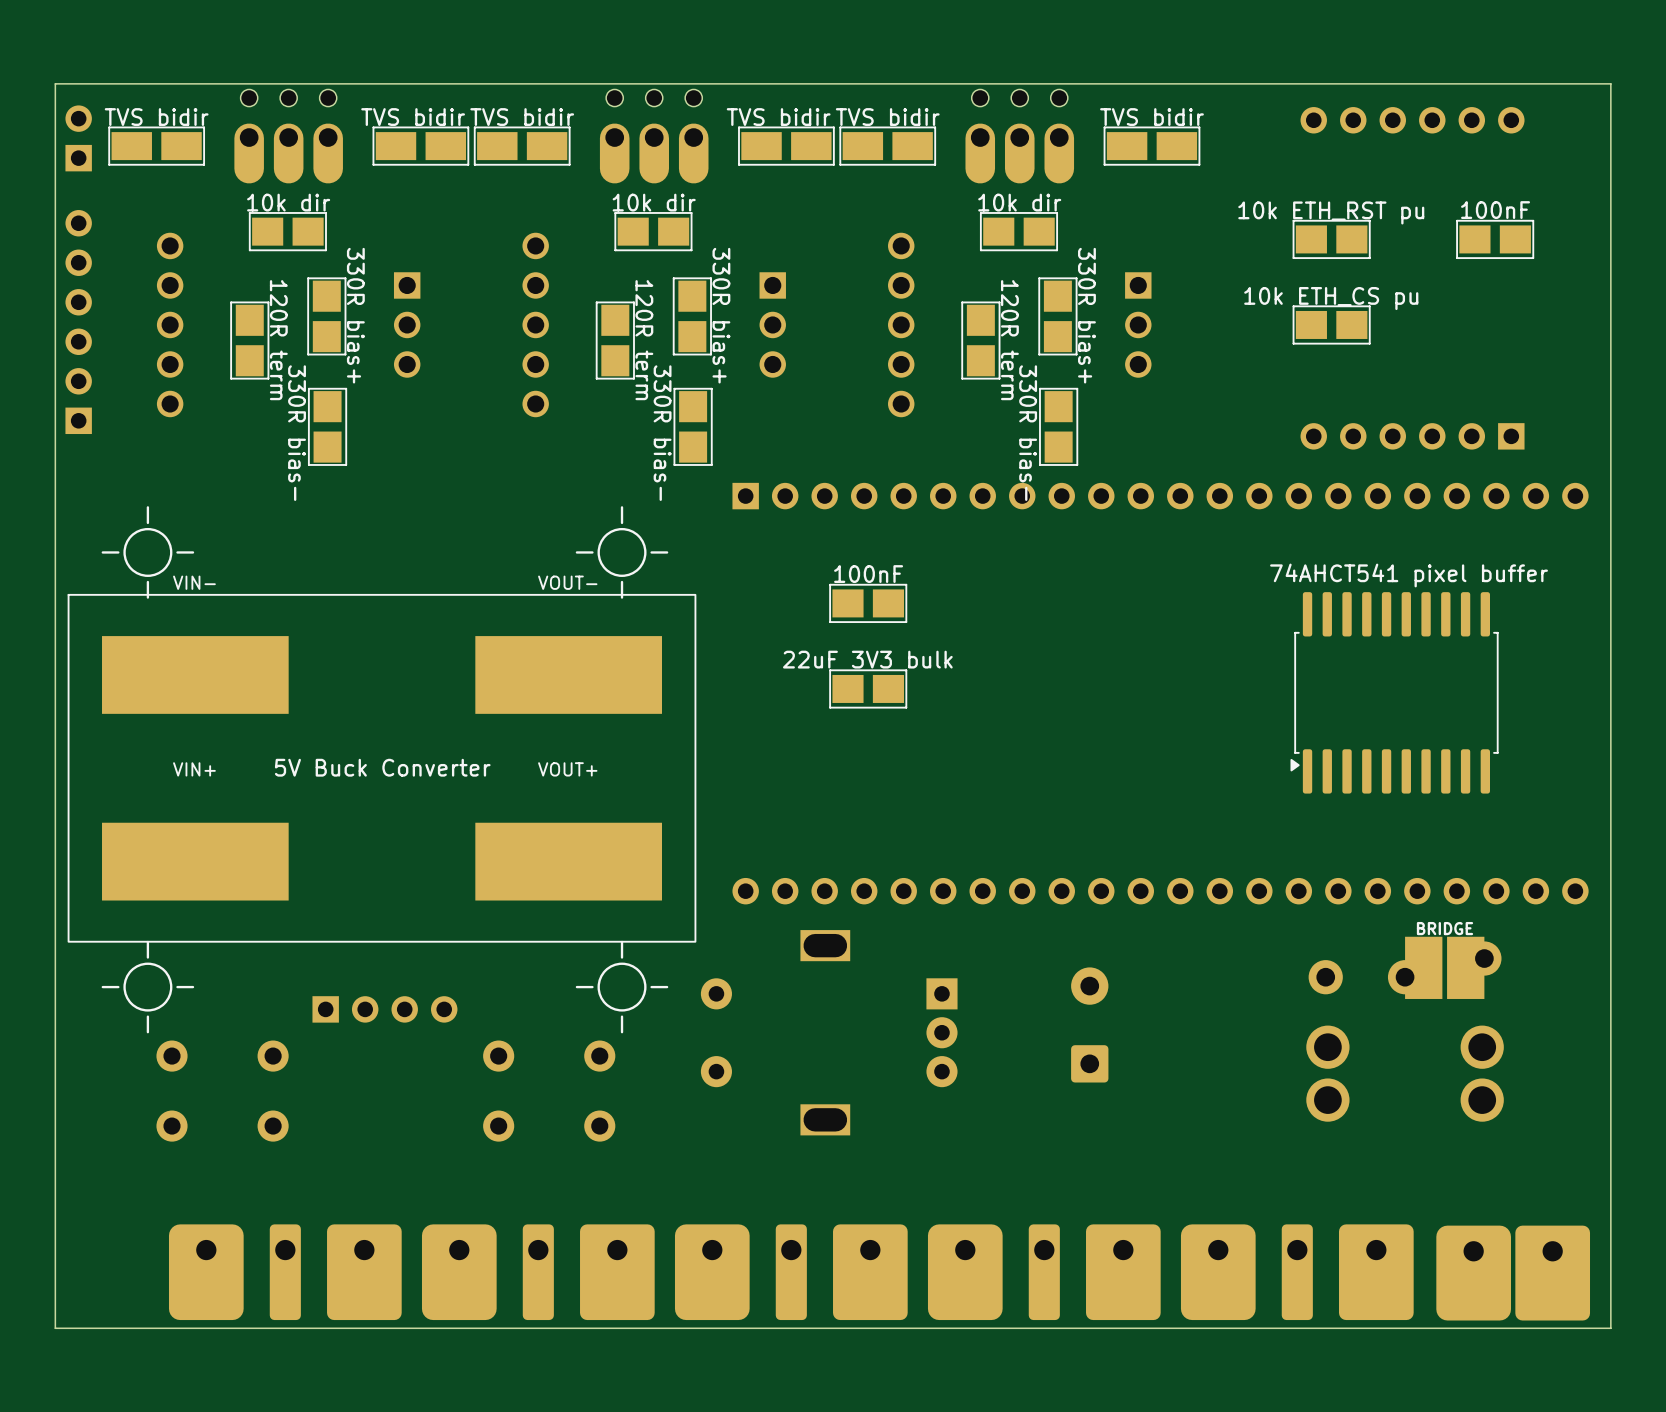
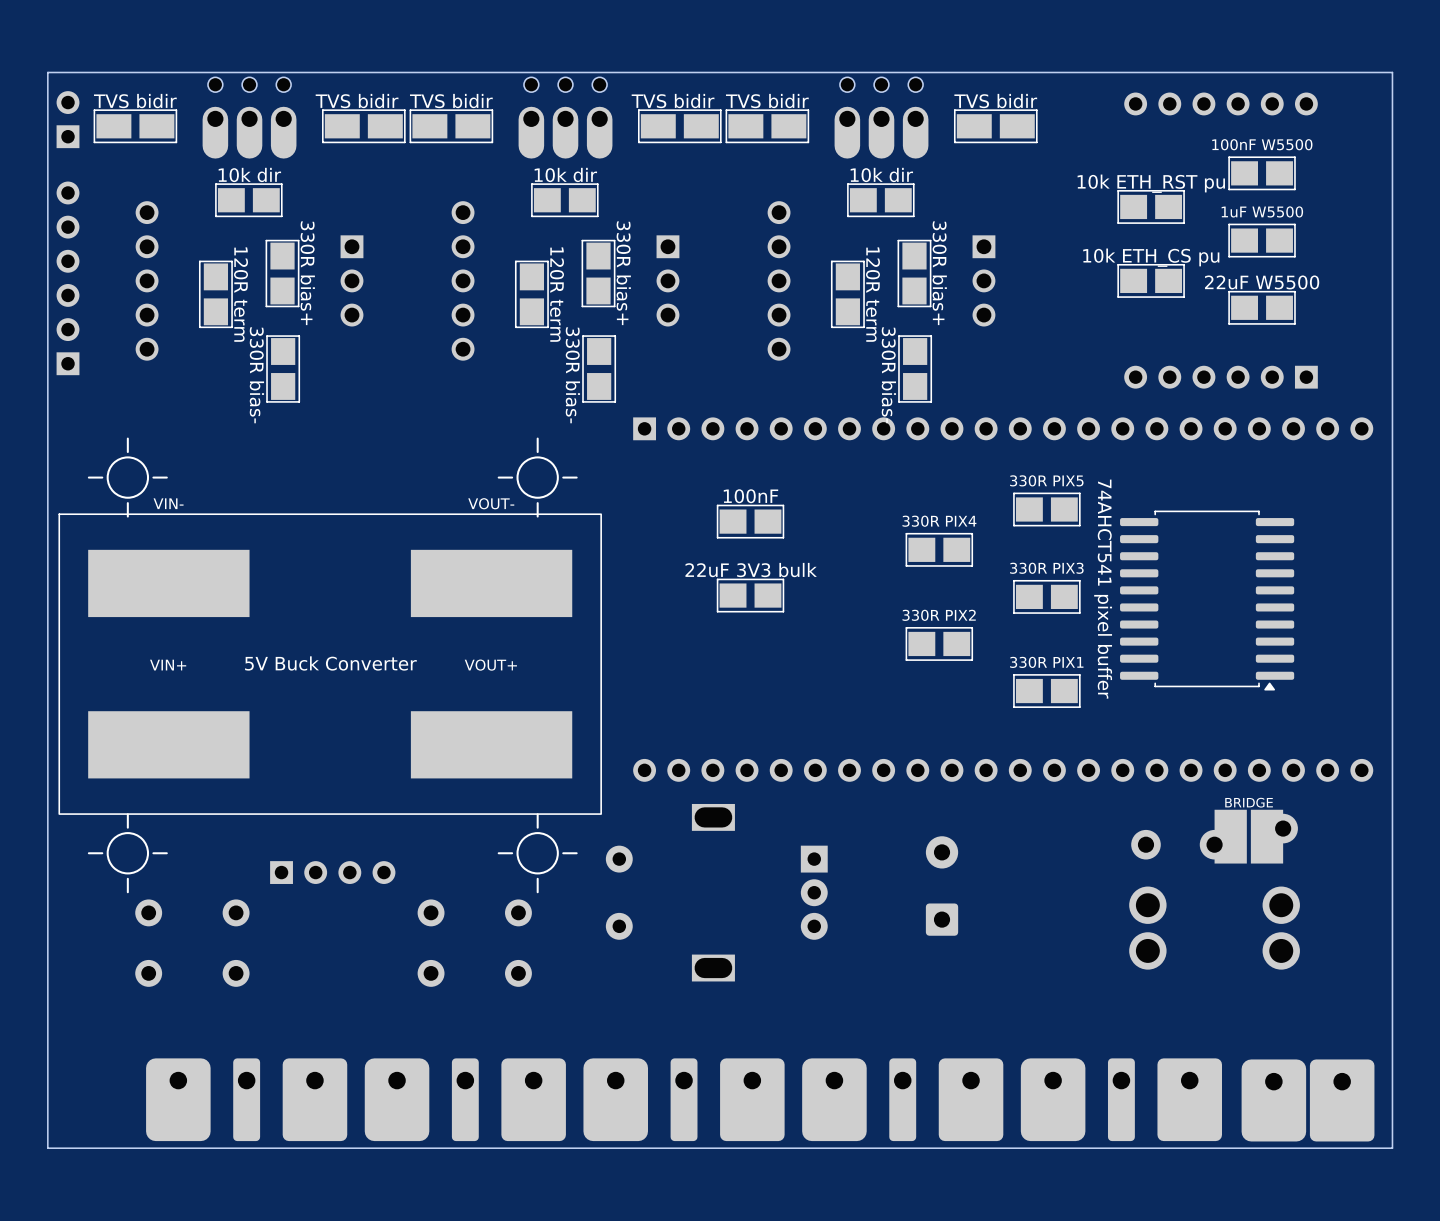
100nF W5500: none -> (1262, 173)
100nF: (1495, 239) -> none
1uF W5500: none -> (1262, 240)
22uF W5500: none -> (1262, 307)
330R PIX5: none -> (1046, 509)
330R PIX4: none -> (939, 549)
330R PIX3: none -> (1046, 596)
74AHCT541 pixel buffer rotation: 0° (1394, 692) -> 90° counterclockwise (1207, 600)
330R PIX2: none -> (939, 643)
330R PIX1: none -> (1046, 691)

